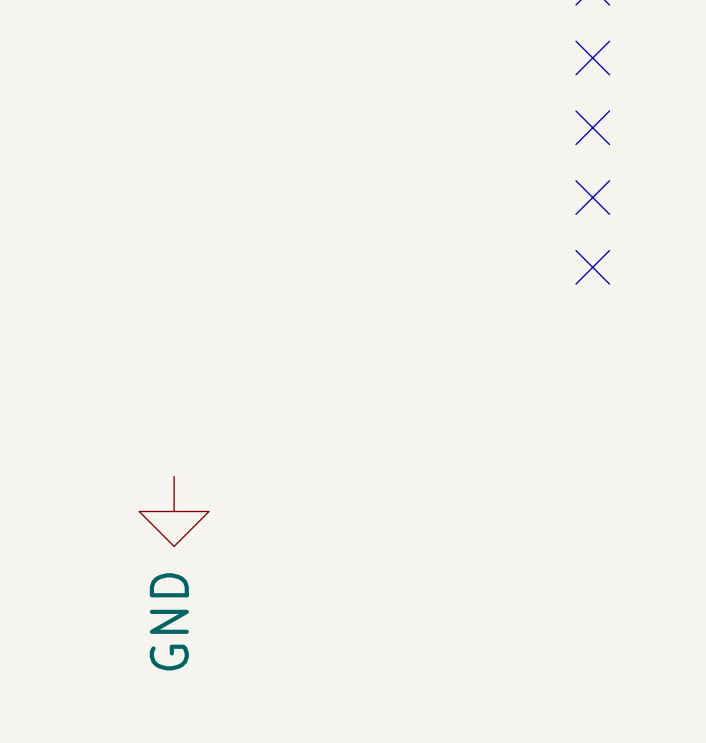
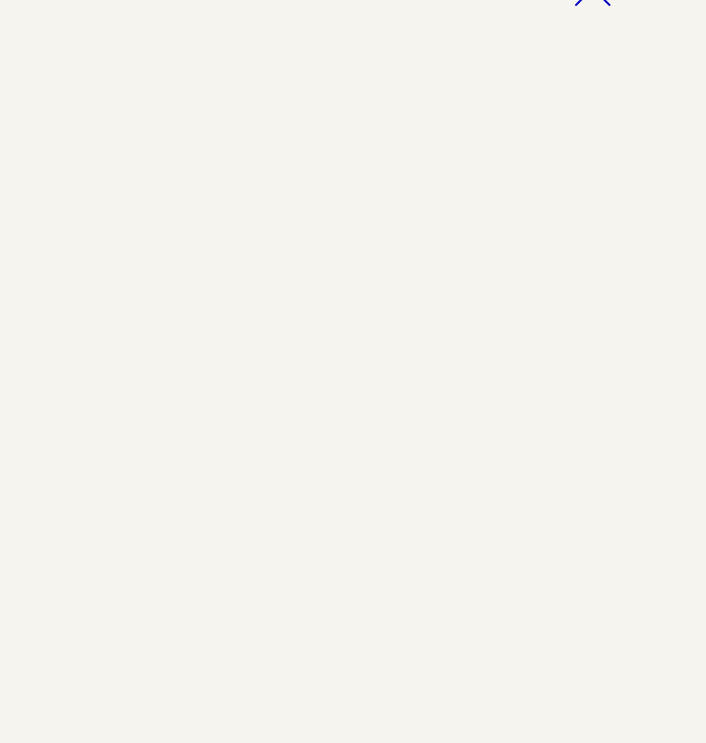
no-connect mark: (592, 58) -> none
no-connect mark: (592, 127) -> none
no-connect mark: (592, 197) -> none
no-connect mark: (592, 267) -> none
power symbol: GND (174, 511) -> none

